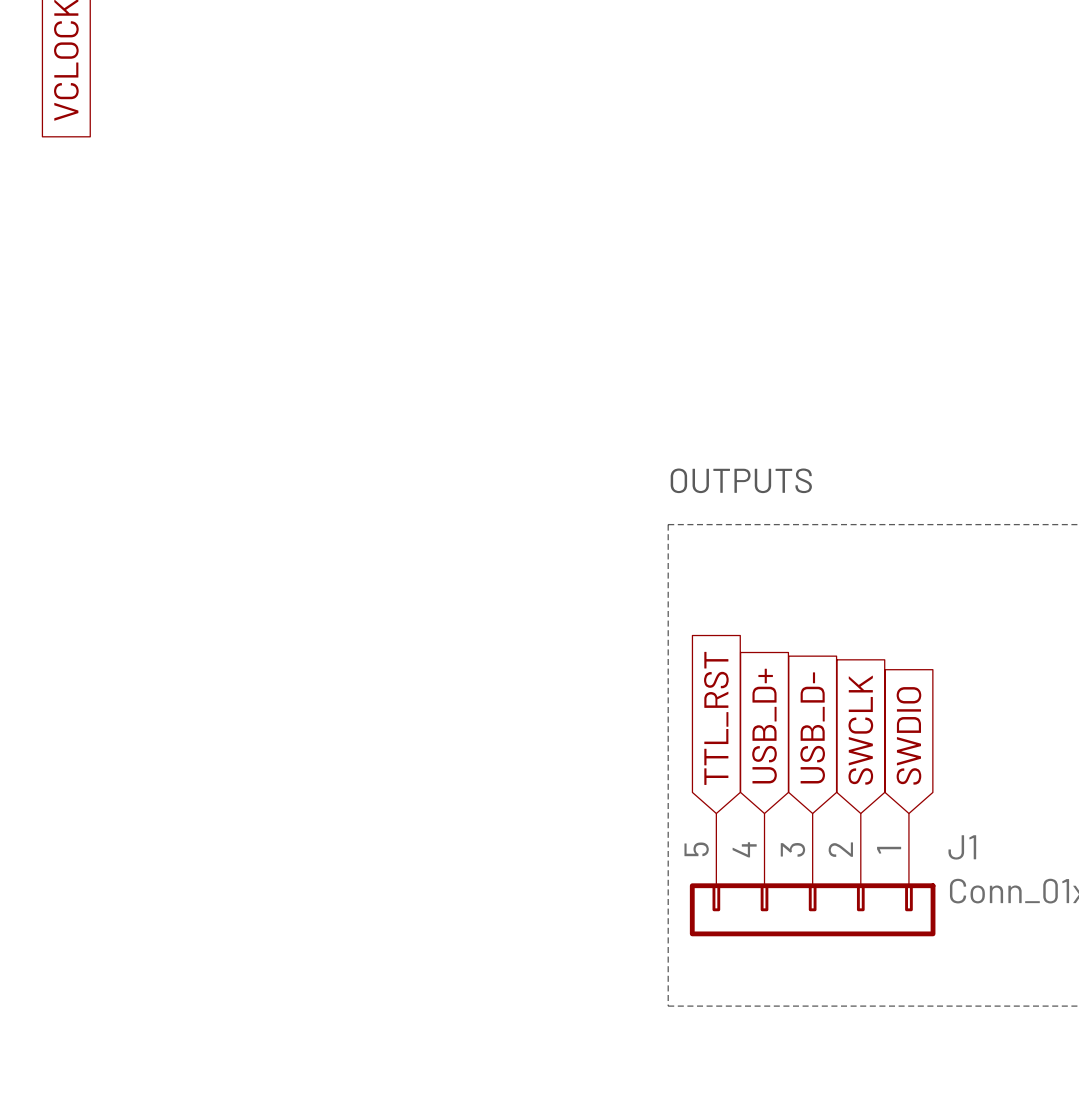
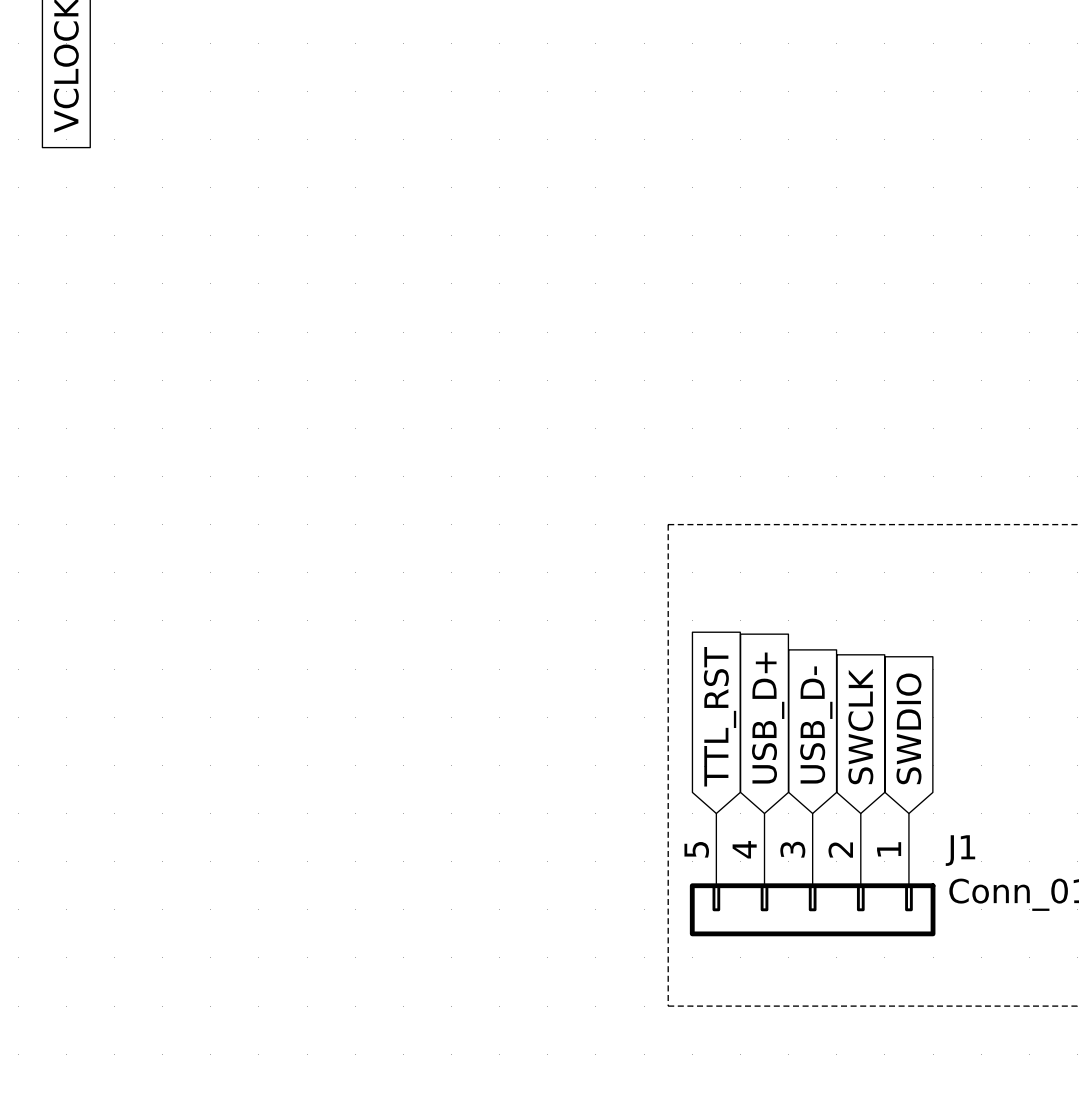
text: OUTPUTS (741, 480) -> none

